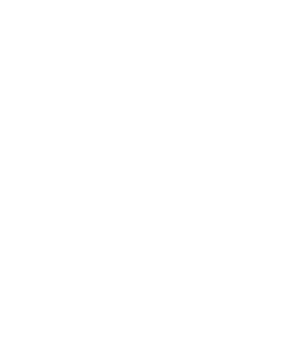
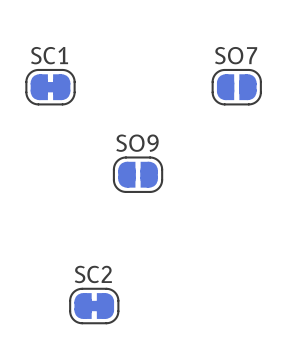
SC1: none -> (50, 87)
SO7: none -> (236, 87)
SO9: none -> (138, 174)
SC2: none -> (94, 306)

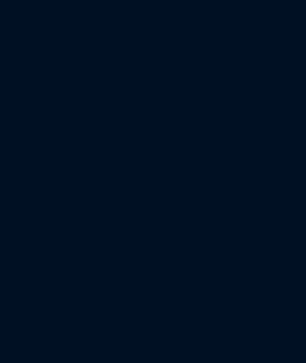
SC1: (50, 87) -> none
SO7: (236, 87) -> none
SO9: (138, 174) -> none
SC2: (94, 306) -> none

